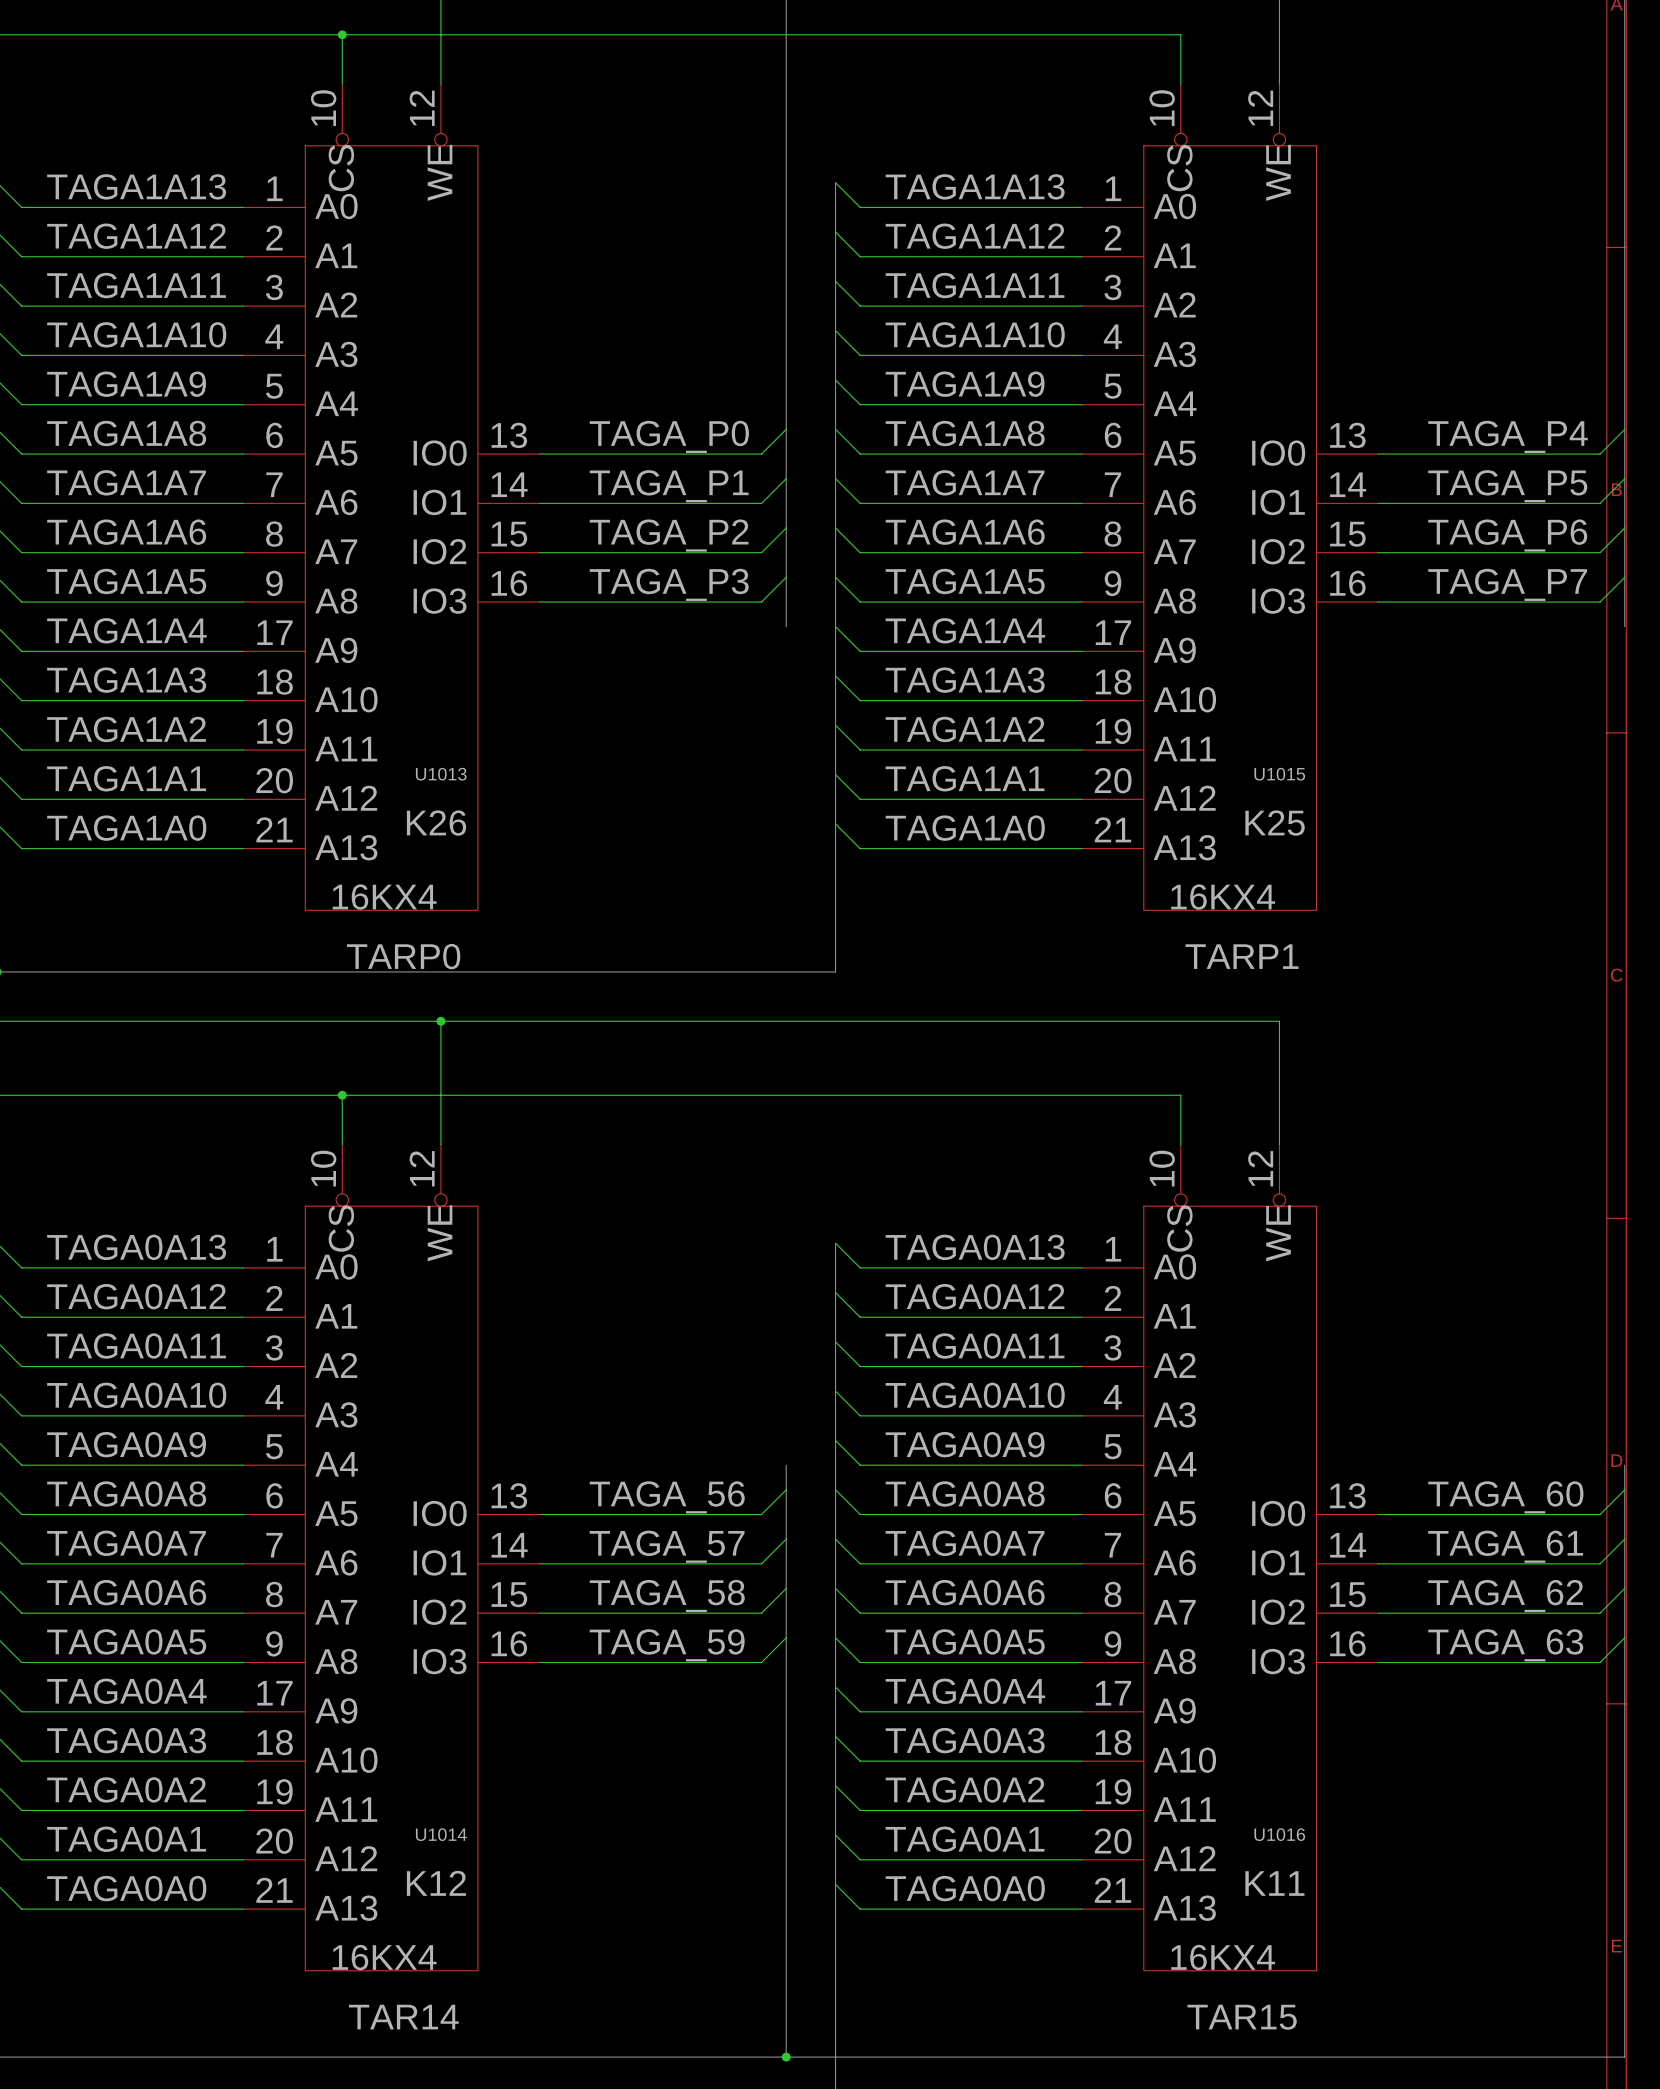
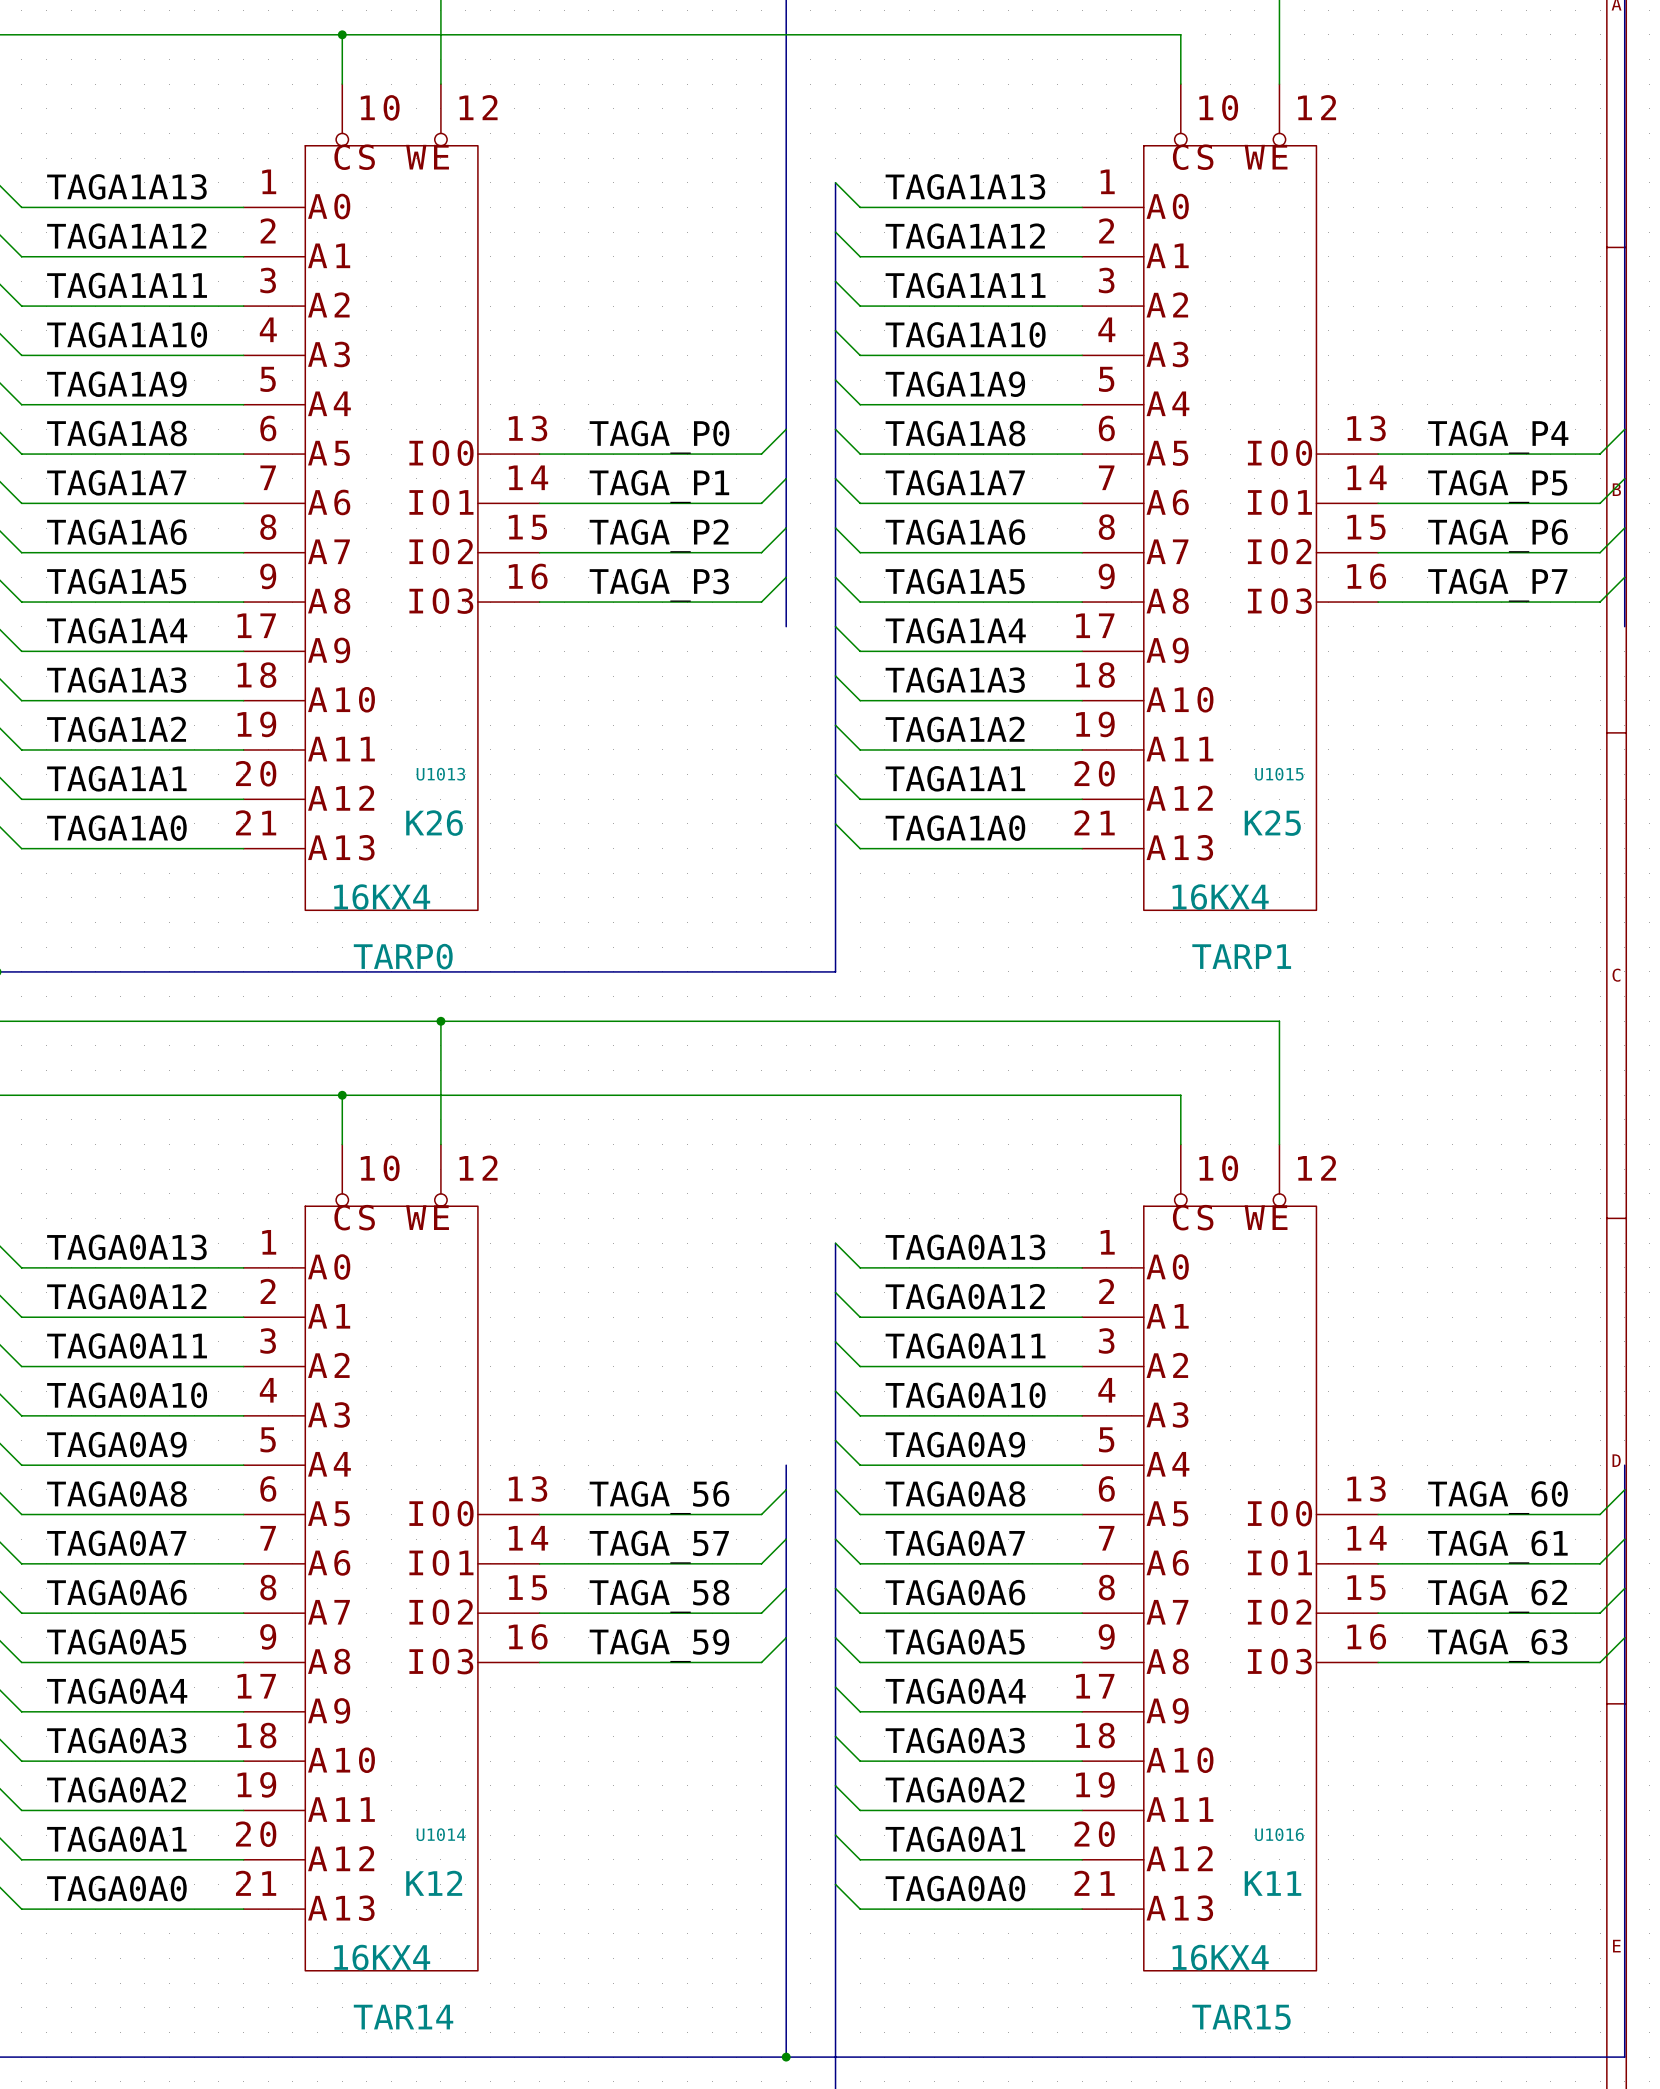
U1013 symbol: [243, 84, 540, 911] -> [243, 84, 540, 911]
U1015 symbol: [1082, 84, 1379, 911] -> [1082, 84, 1379, 911]
U1014 symbol: [243, 1144, 540, 1971] -> [243, 1144, 540, 1971]
U1016 symbol: [1082, 1144, 1379, 1971] -> [1082, 1144, 1379, 1971]

